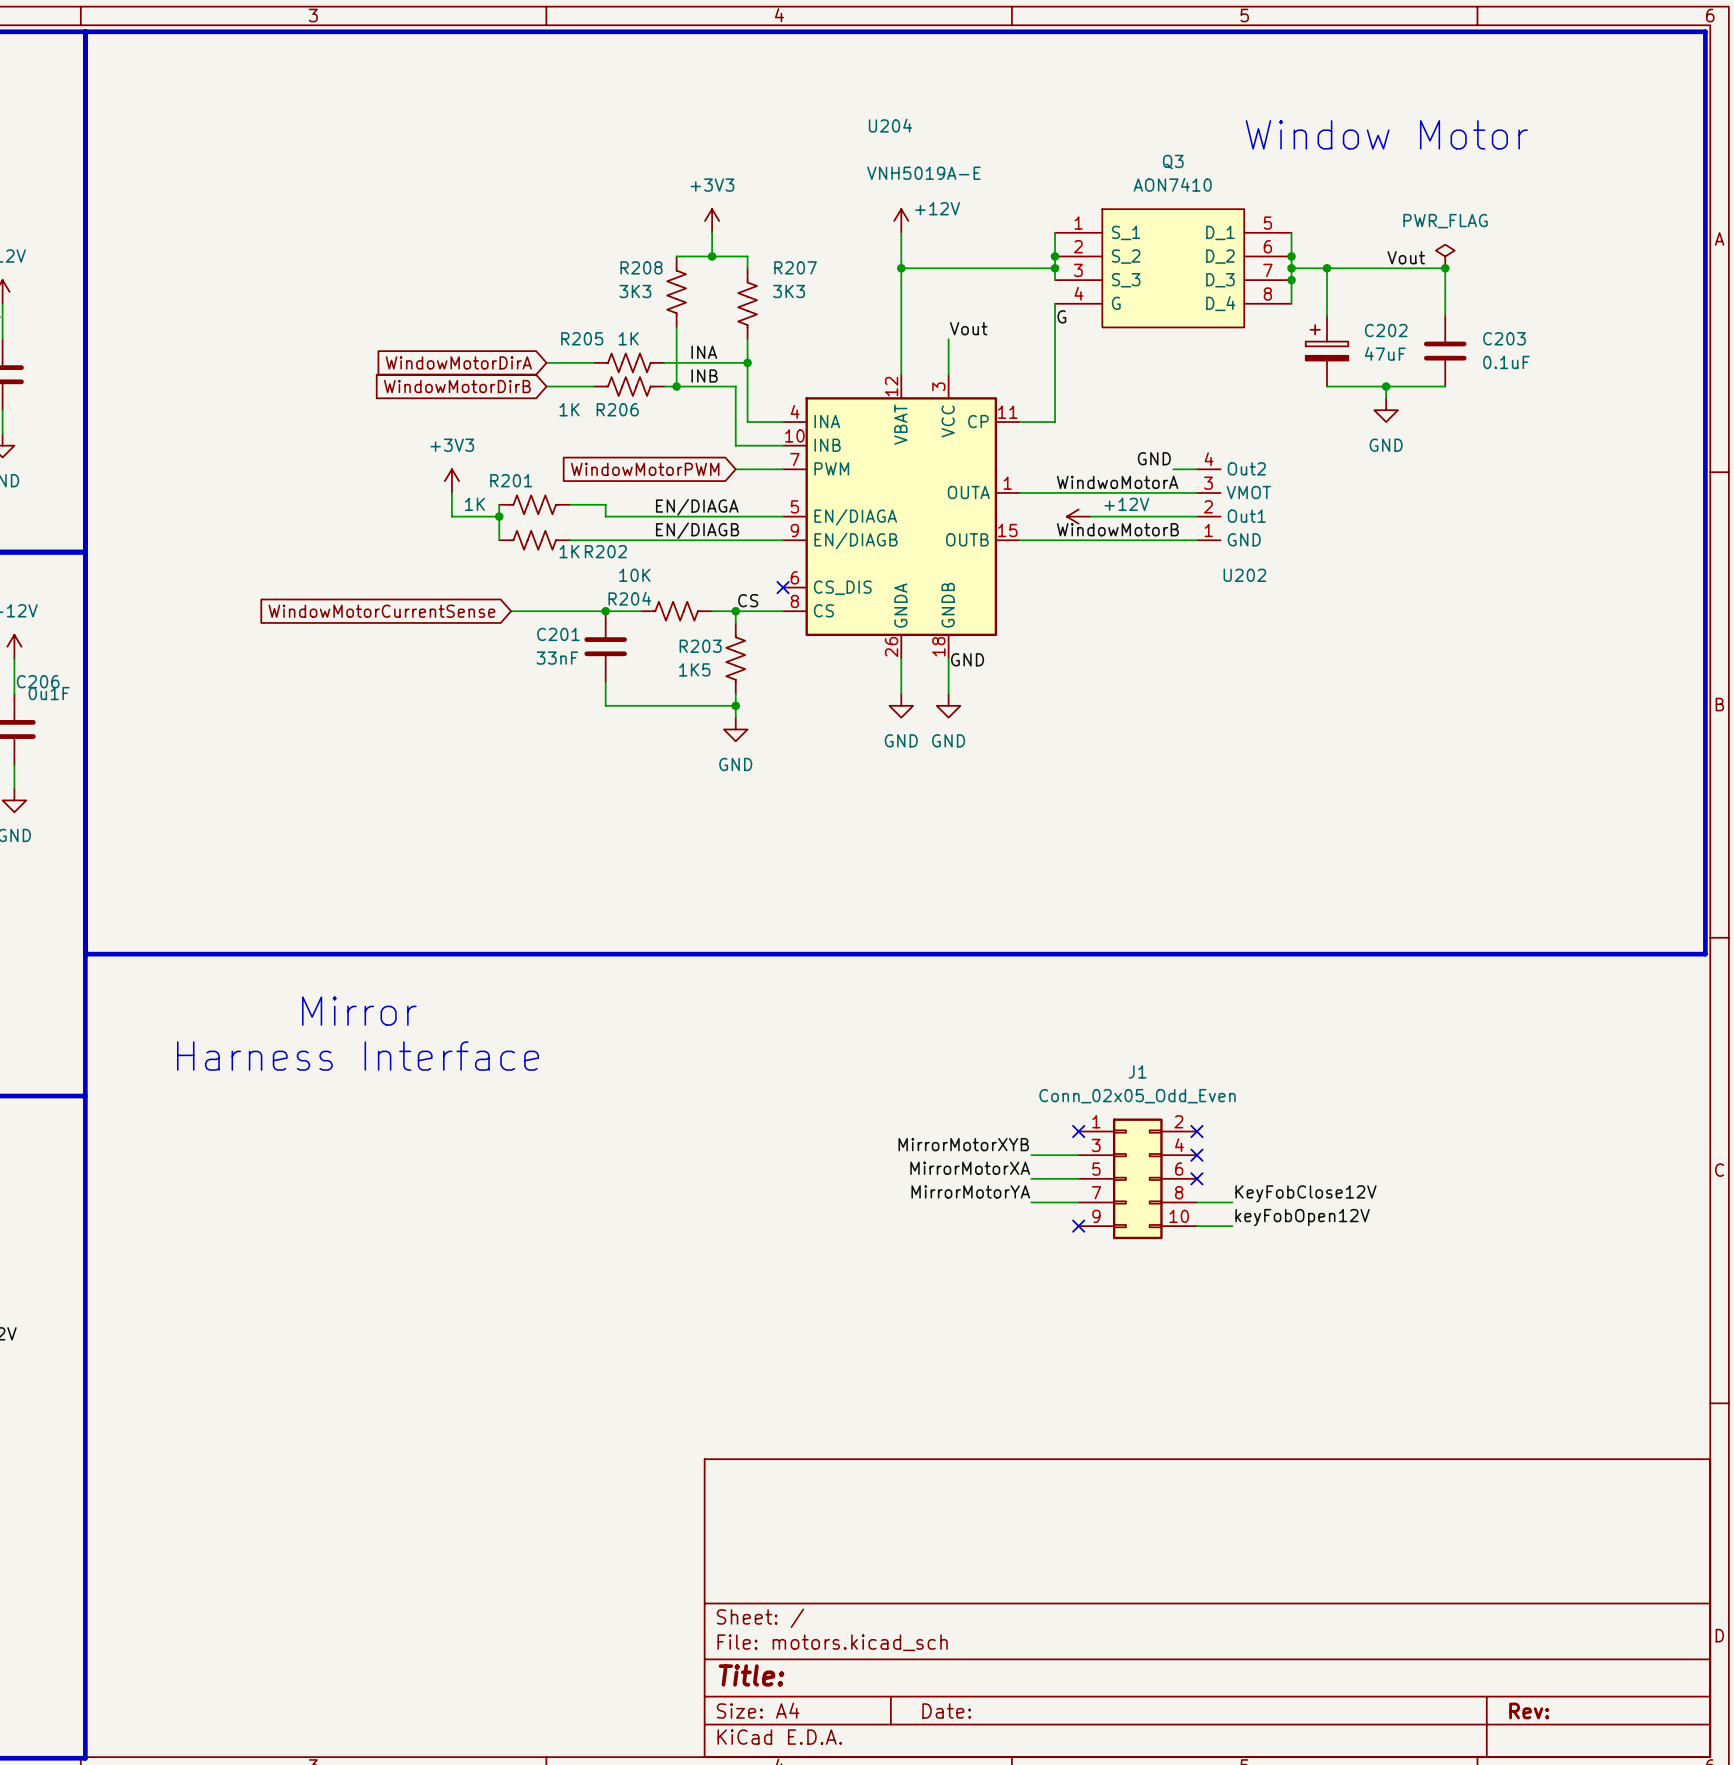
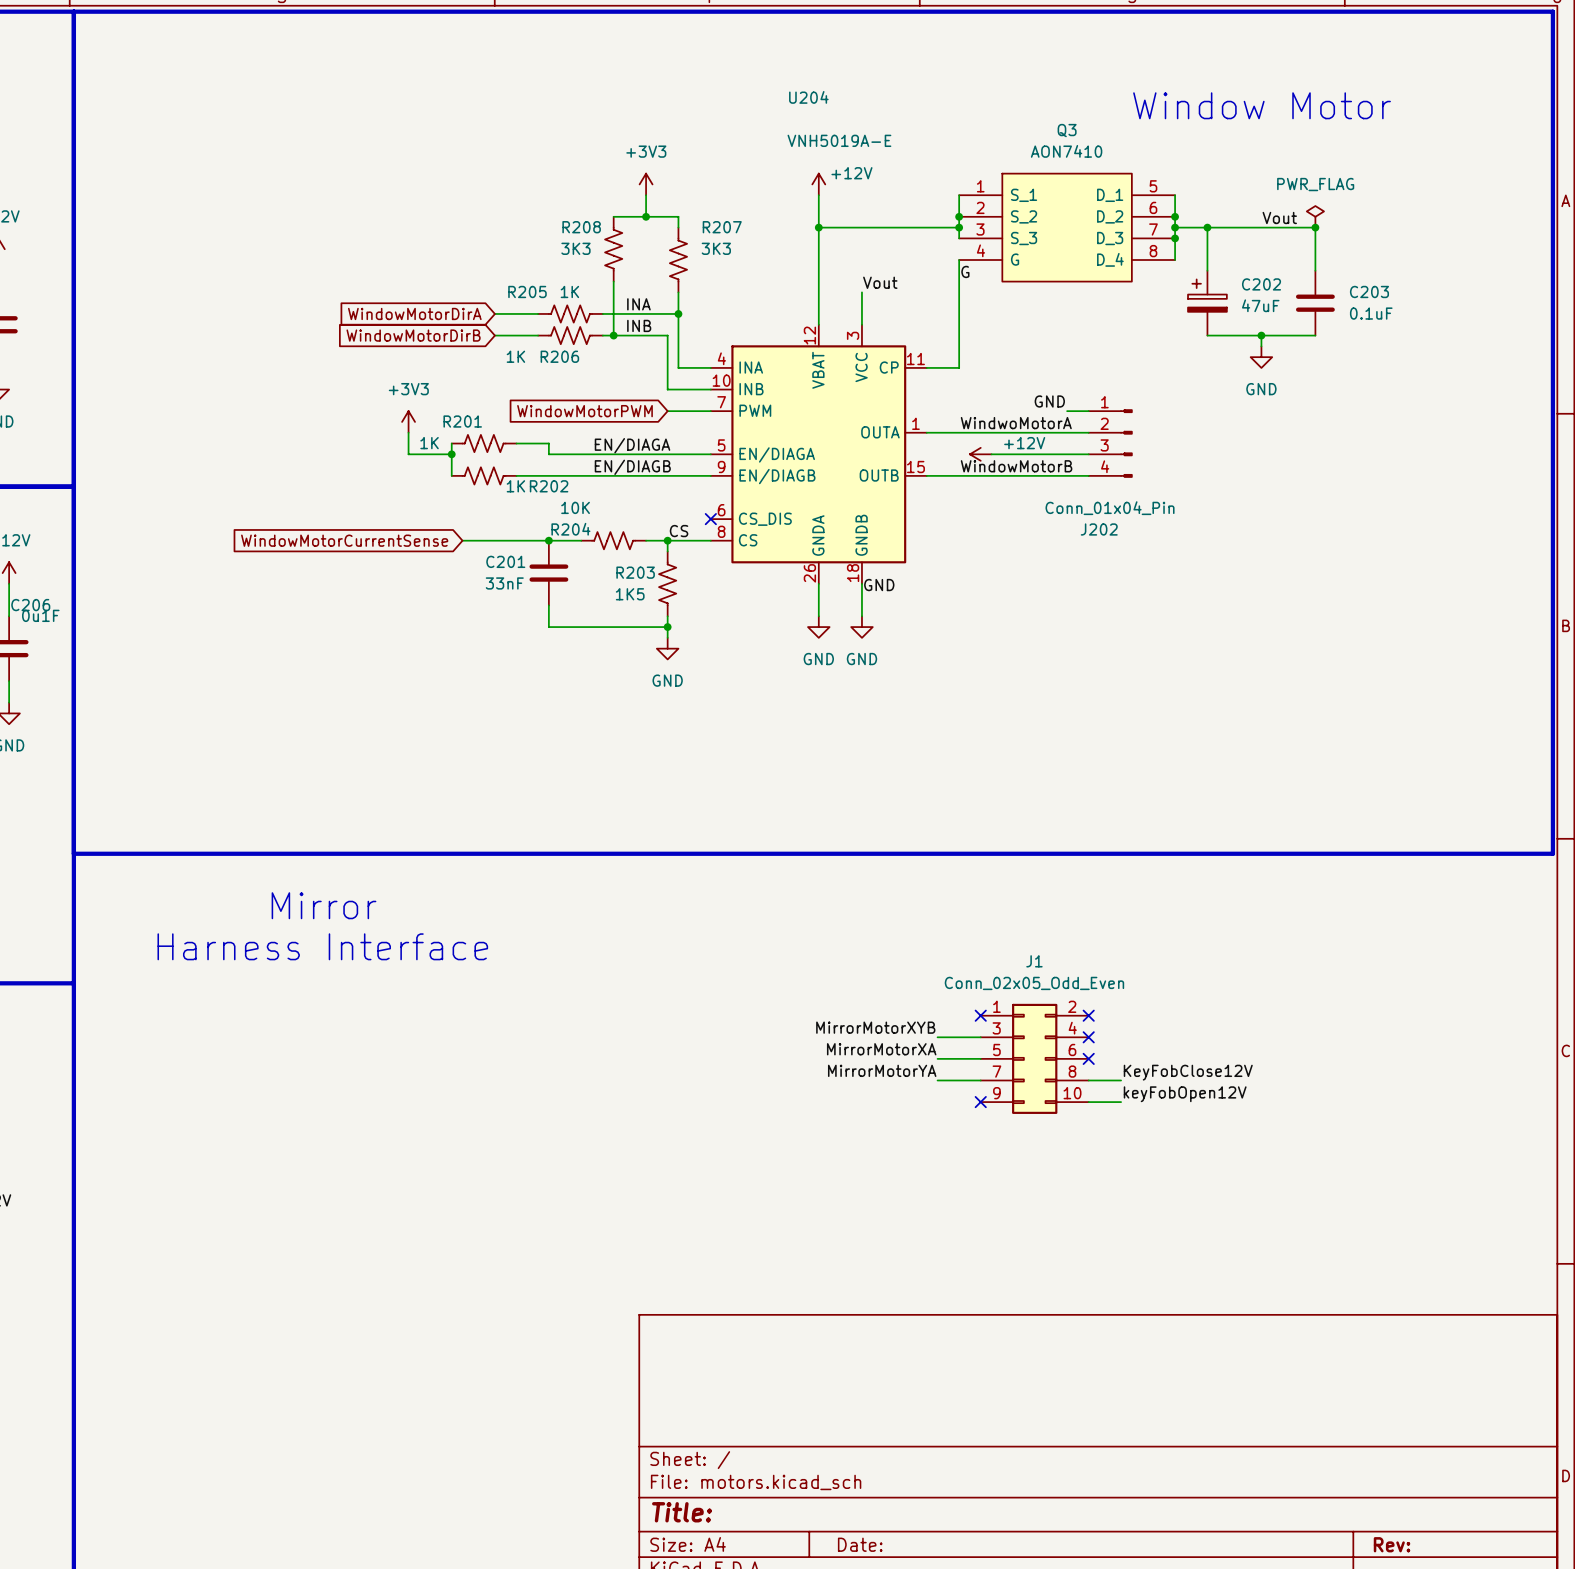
U202: (1208, 504) -> none
J202: none -> Conn_01x04_Pin (1110, 443)

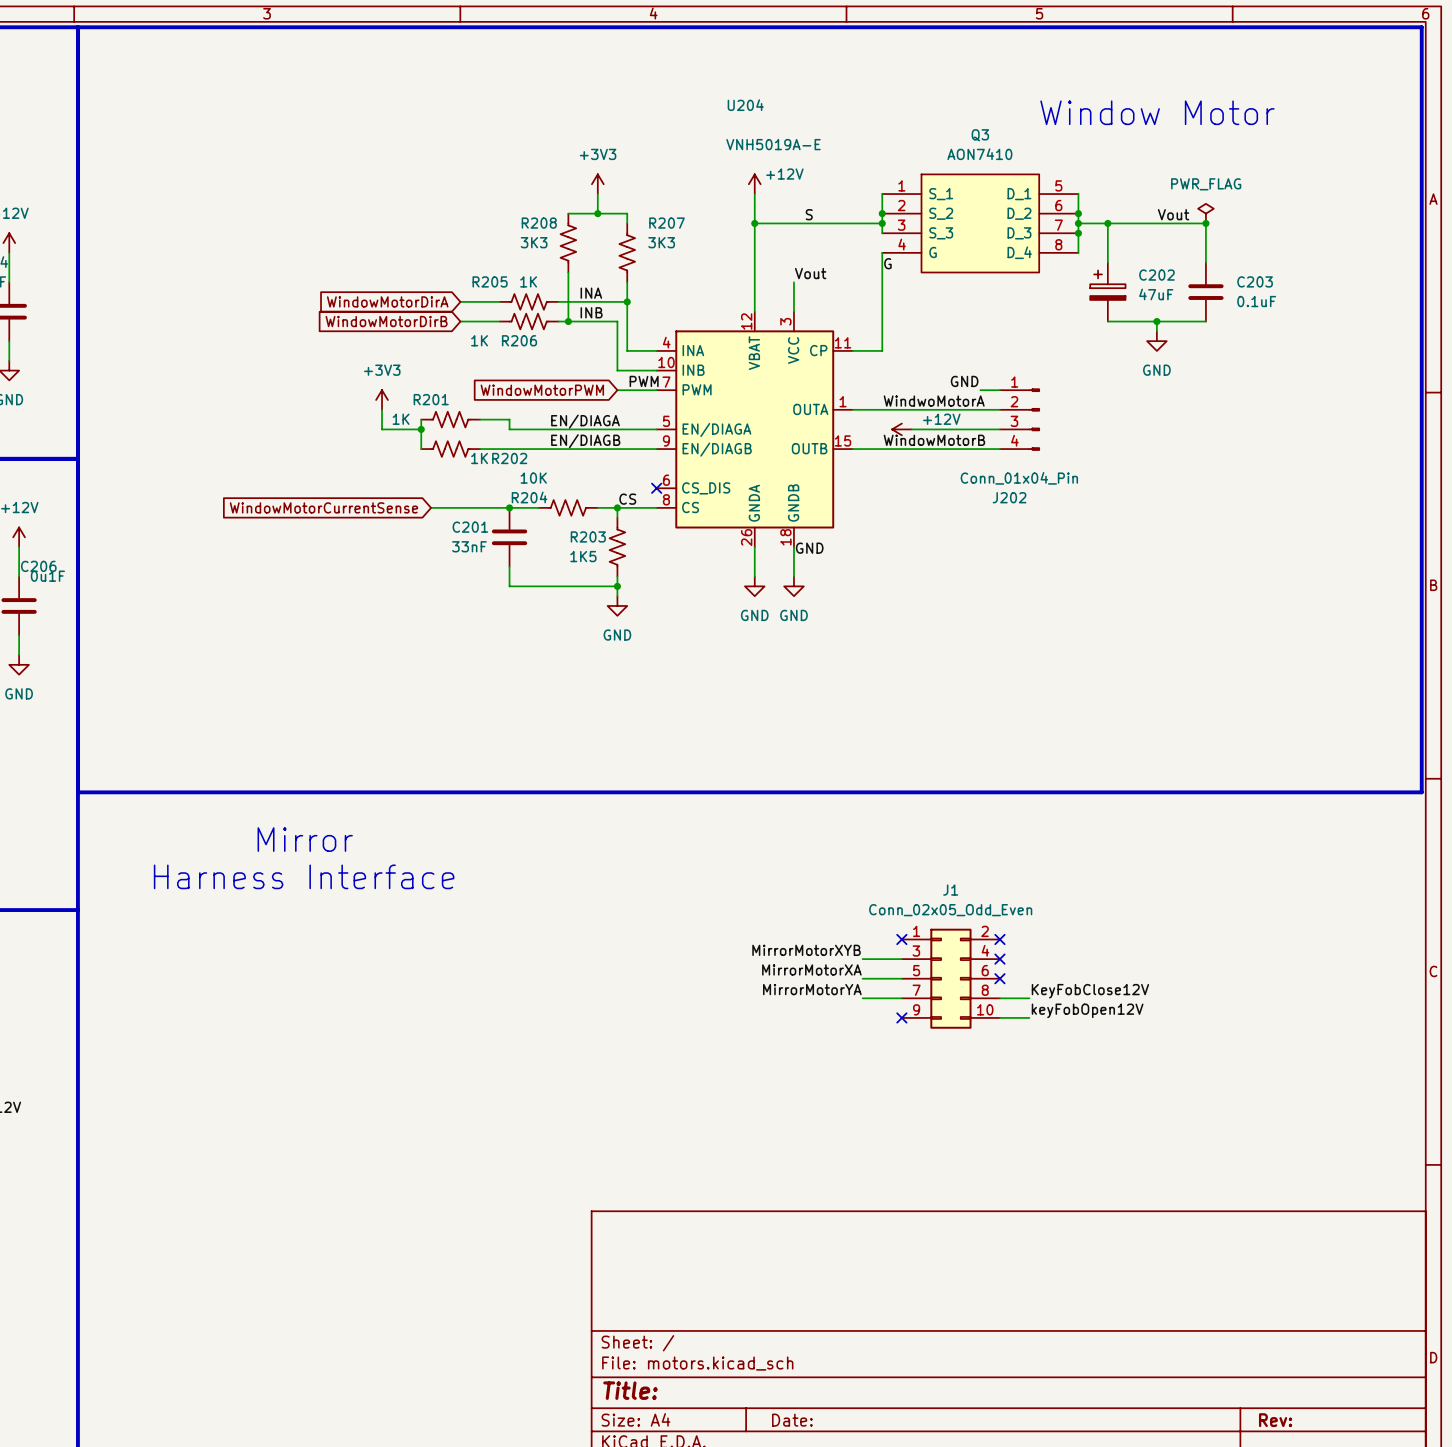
label: none -> S (809, 214)
label: none -> PWM (644, 381)

